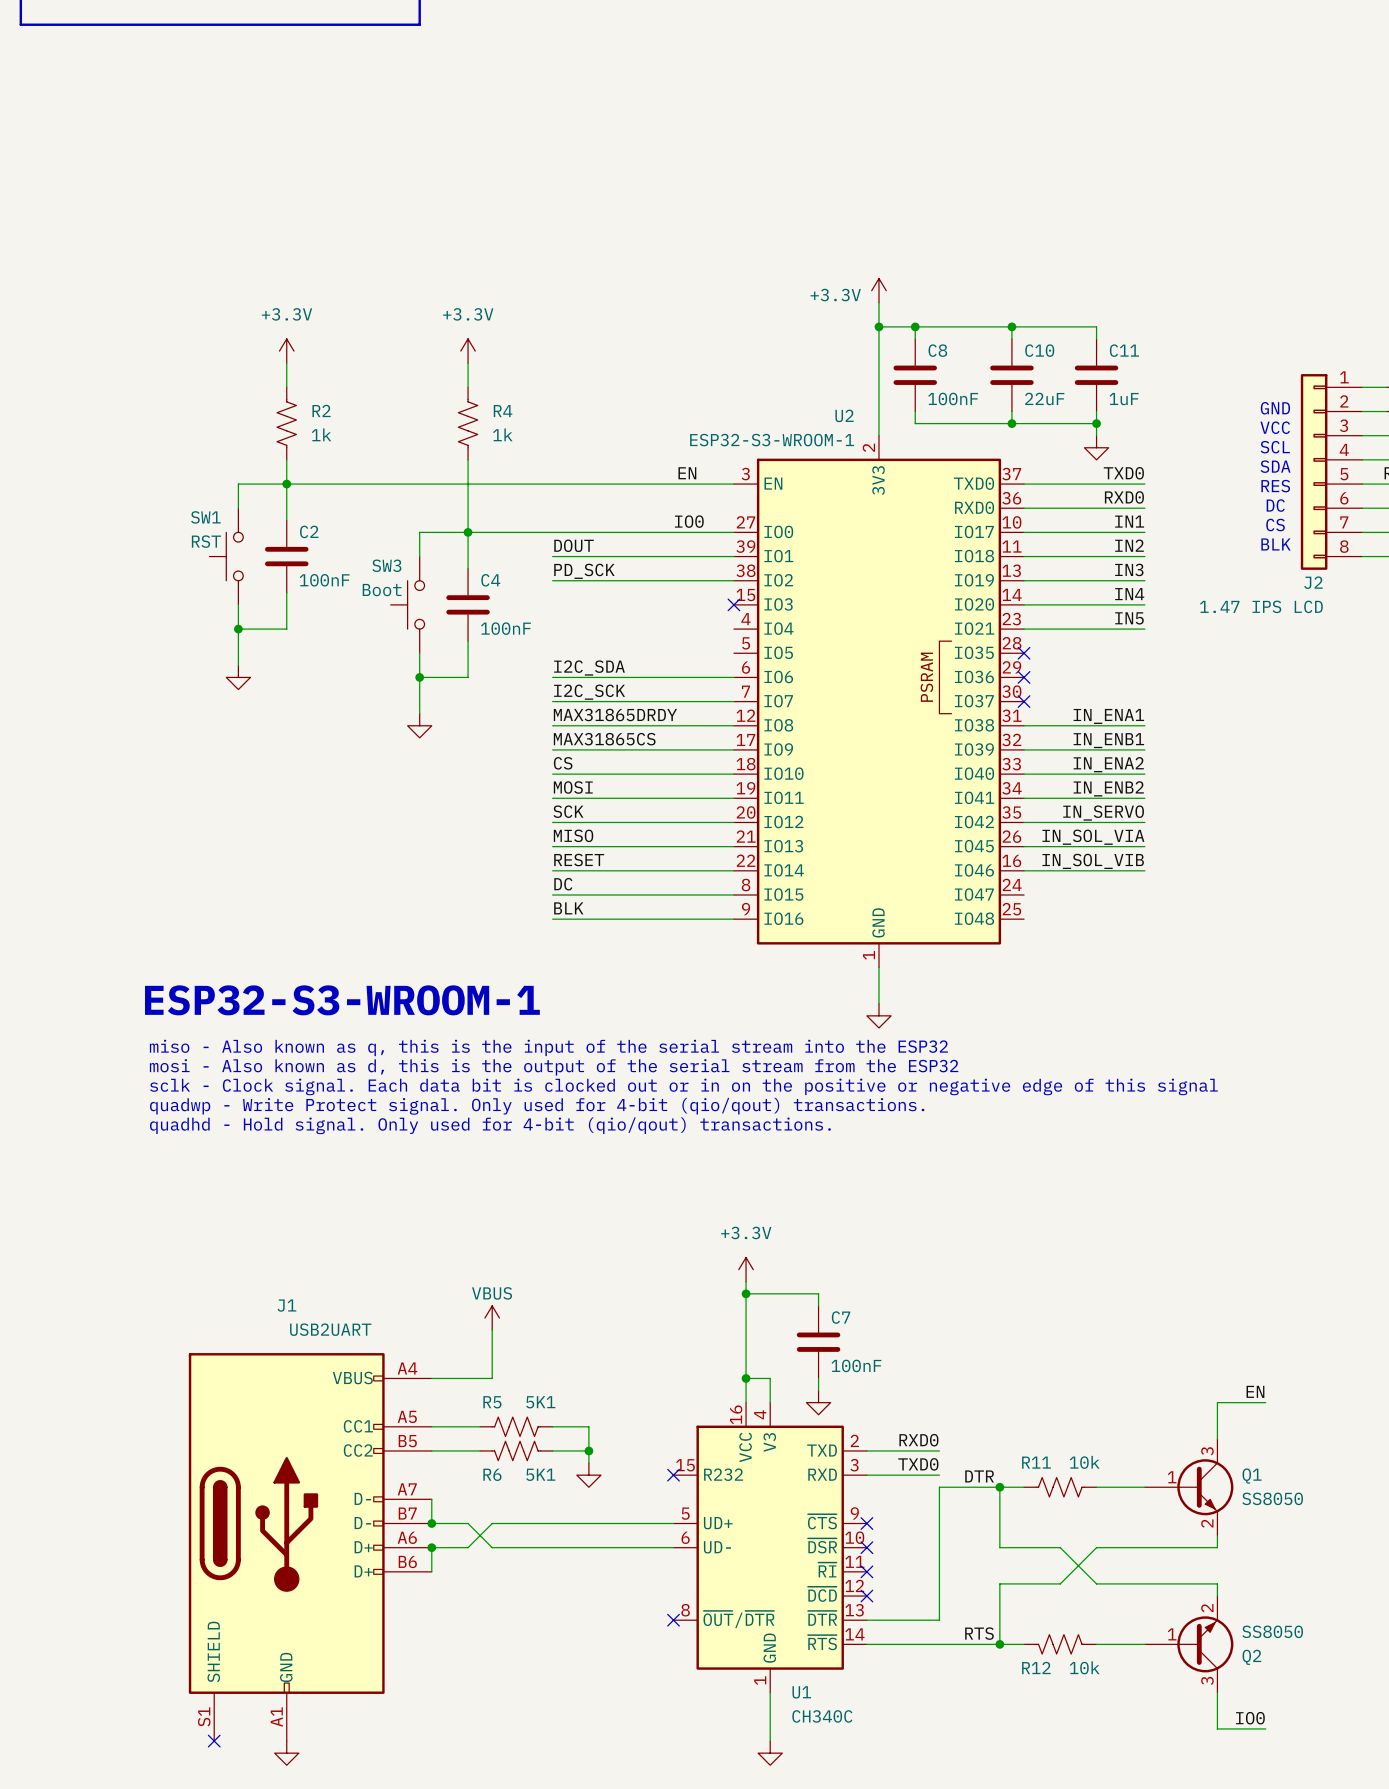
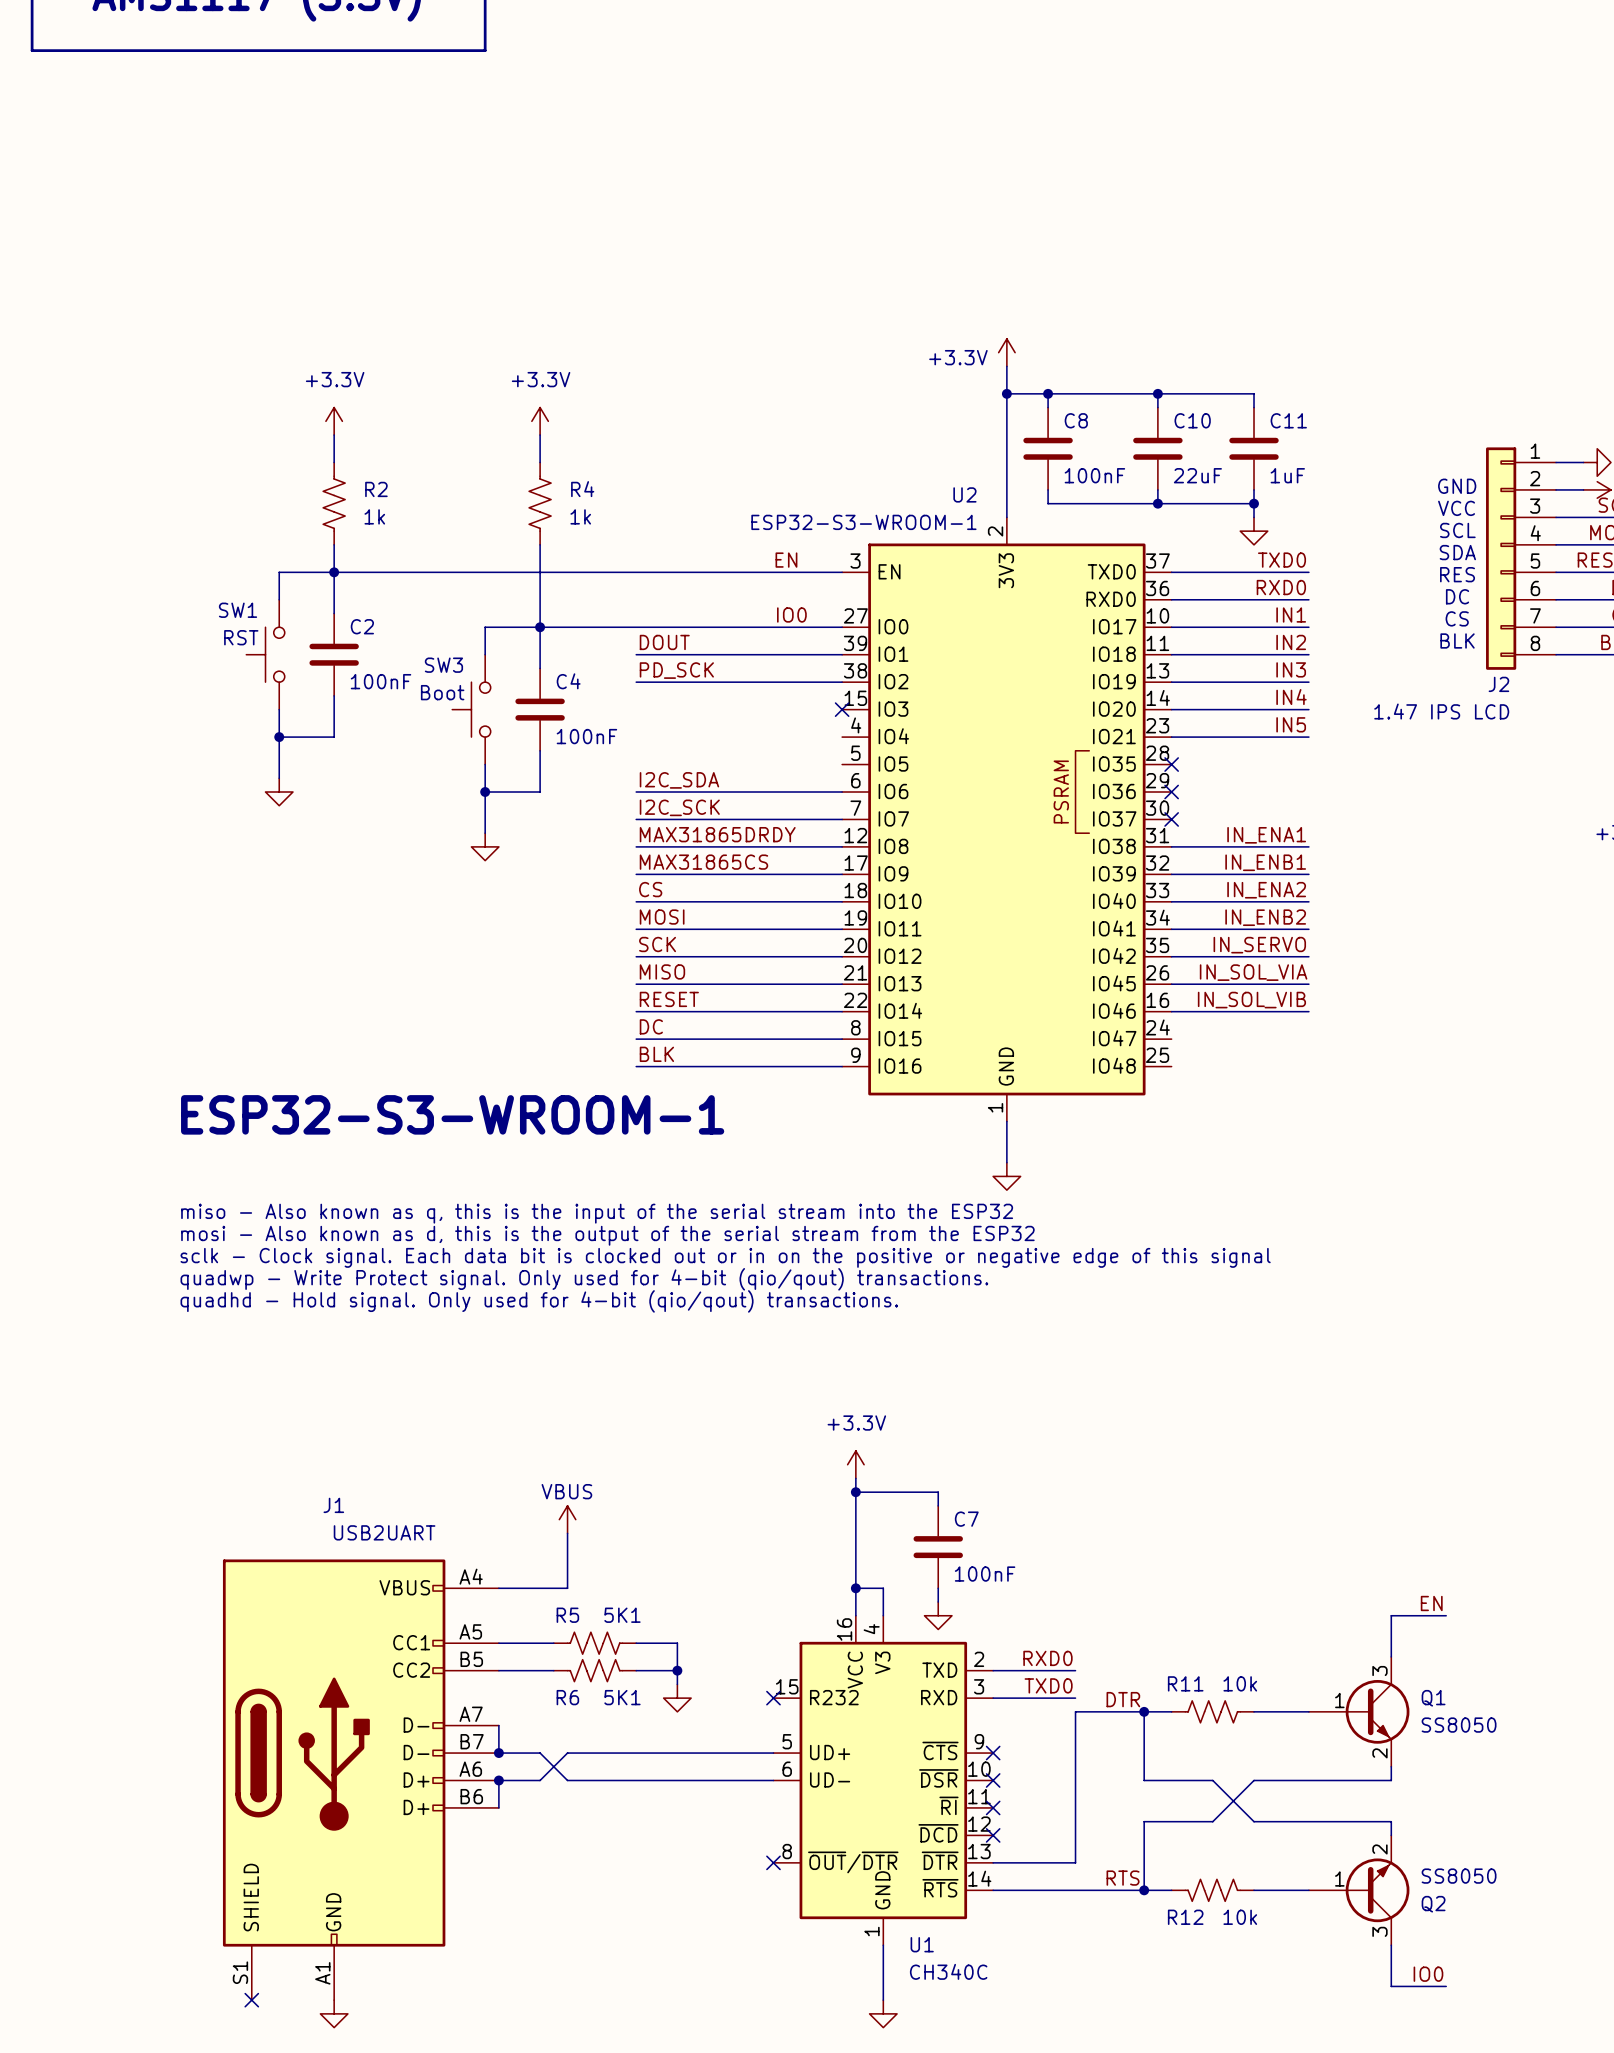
text position: ESP32-S3-WROOM-1 (342, 1000) -> ESP32-S3-WROOM-1 (452, 1114)

